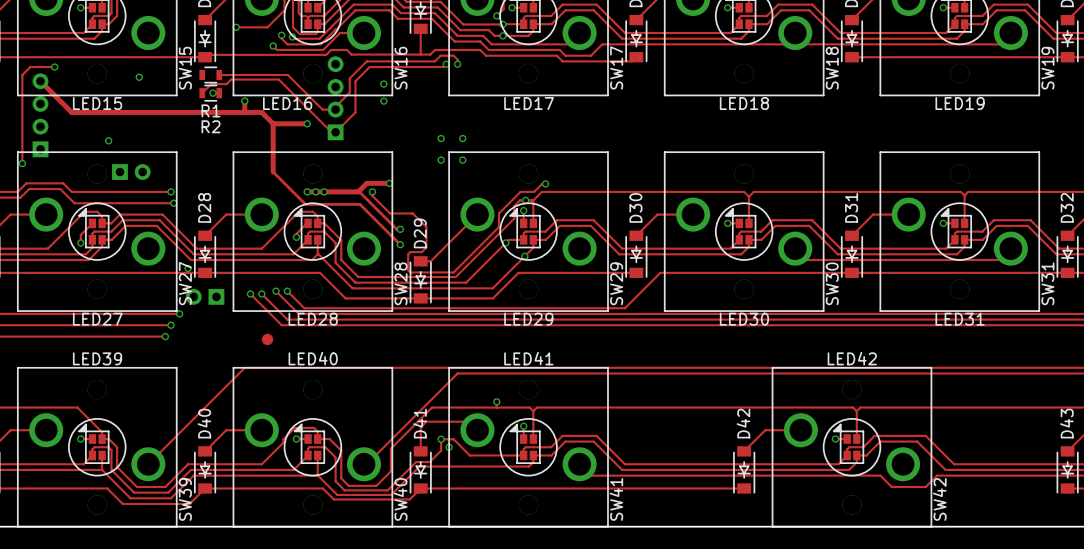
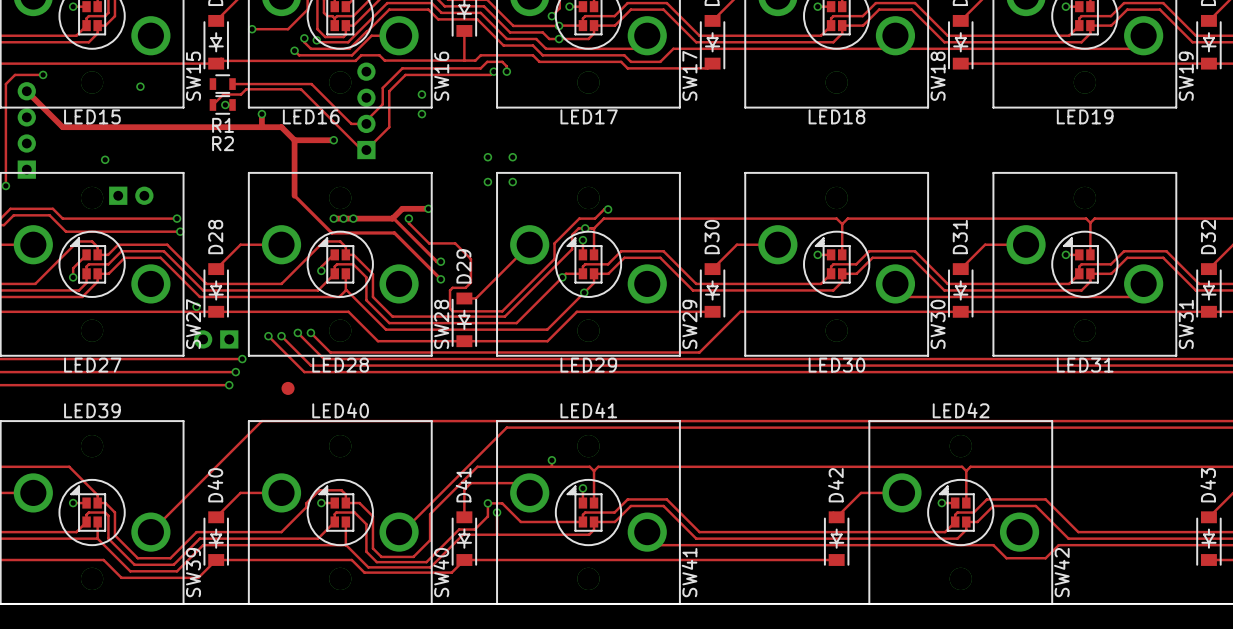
track: none -> (186, 359) (242, 359)
via: (179, 313) -> none
via: none -> (242, 359)
track: none -> (177, 372) (235, 372)
via: (171, 325) -> none
via: none -> (235, 372)
track: none -> (170, 385) (229, 385)
via: (165, 336) -> none
via: none -> (229, 385)

